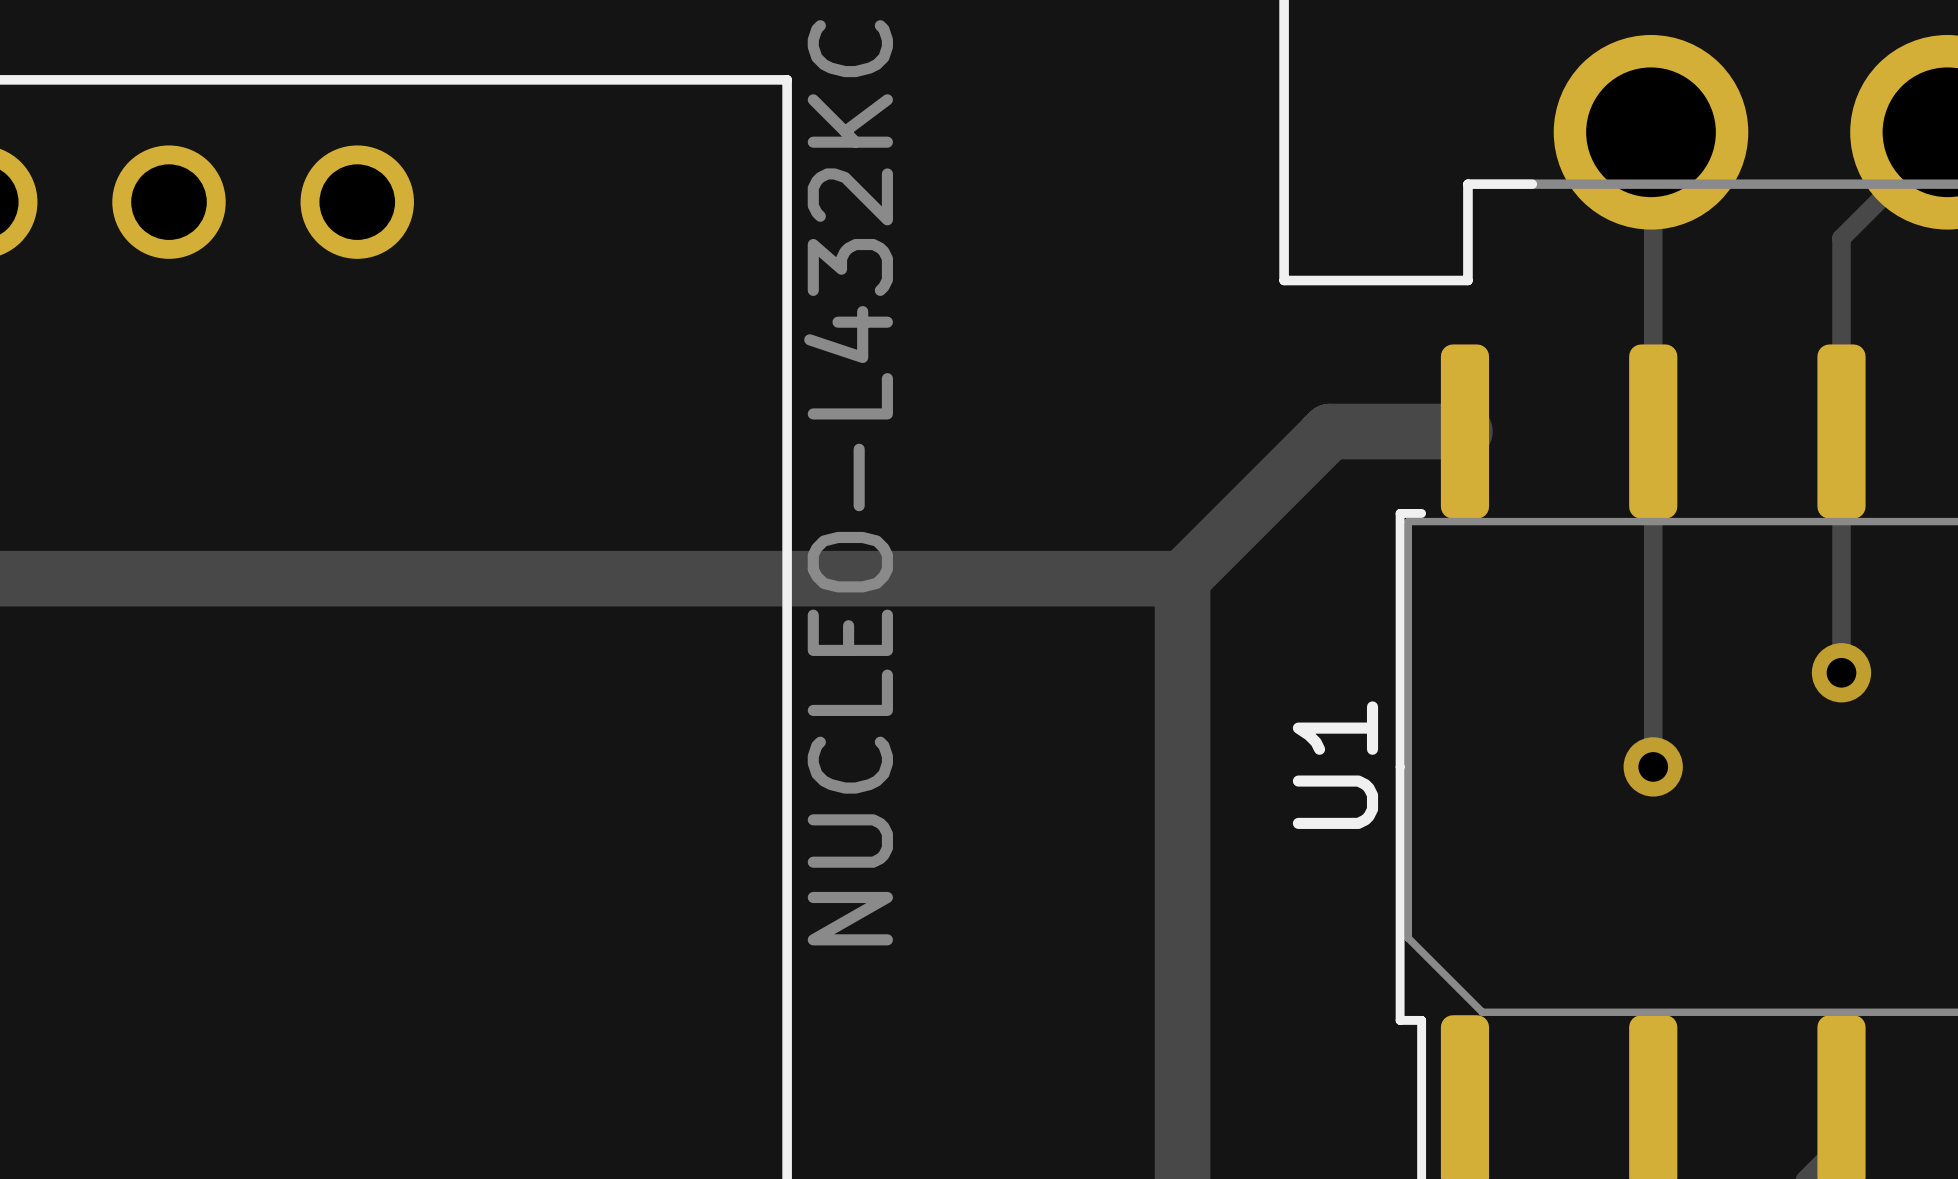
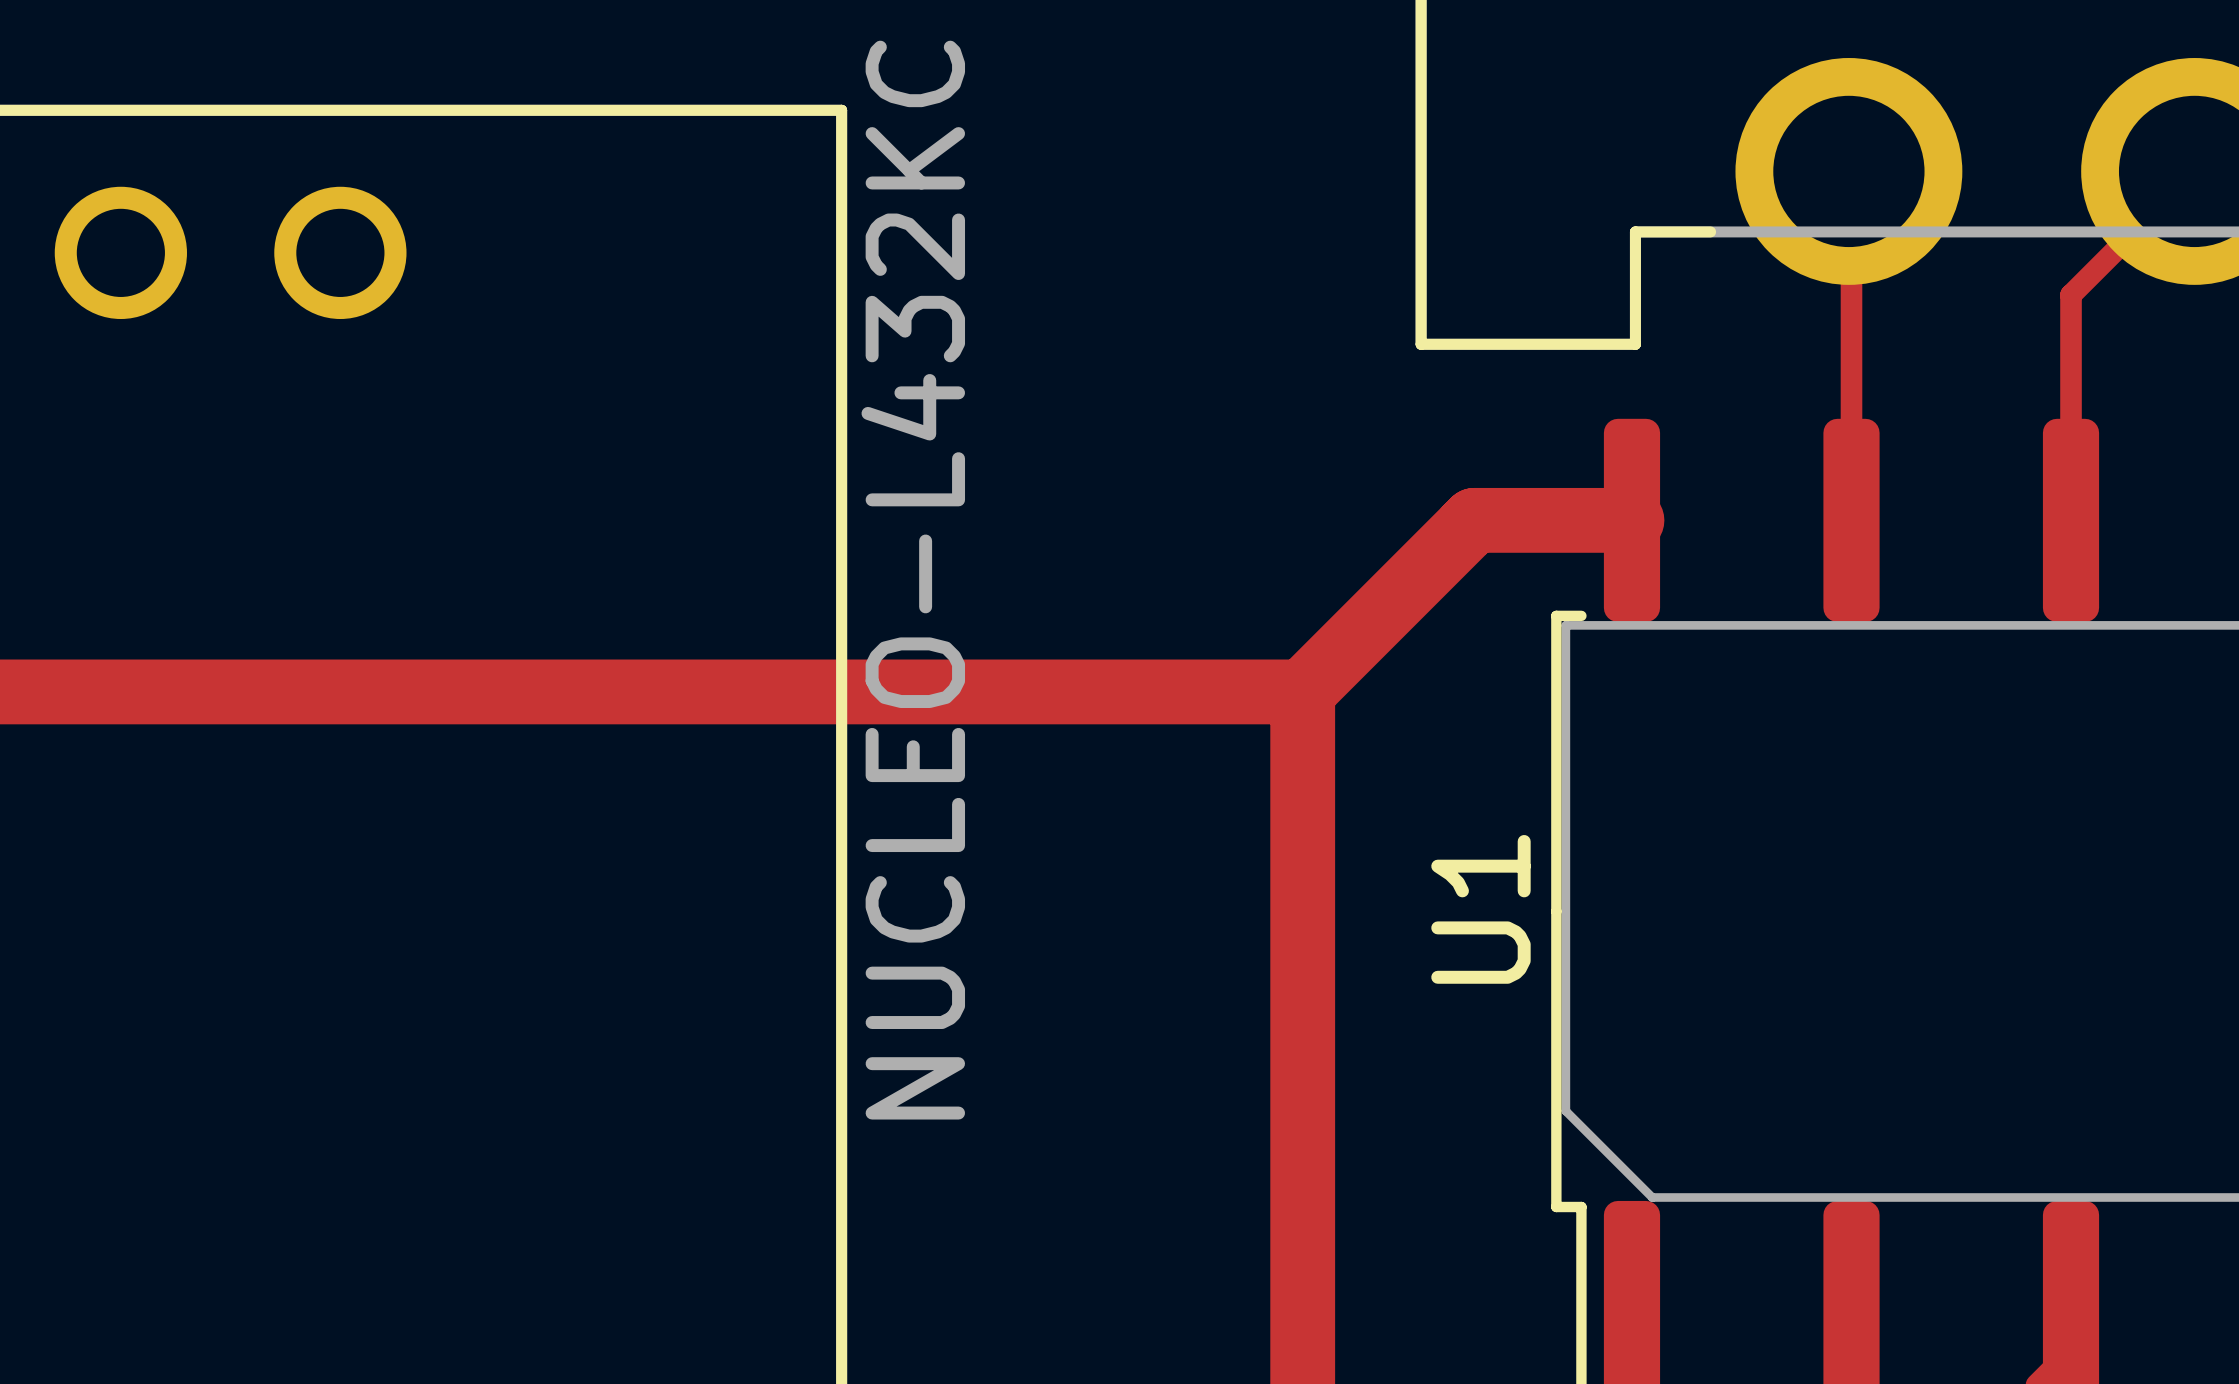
track: (1653, 431) (1653, 766) -> none
track: (1841, 431) (1841, 672) -> none
via: (1841, 672) -> none
via: (1653, 766) -> none

